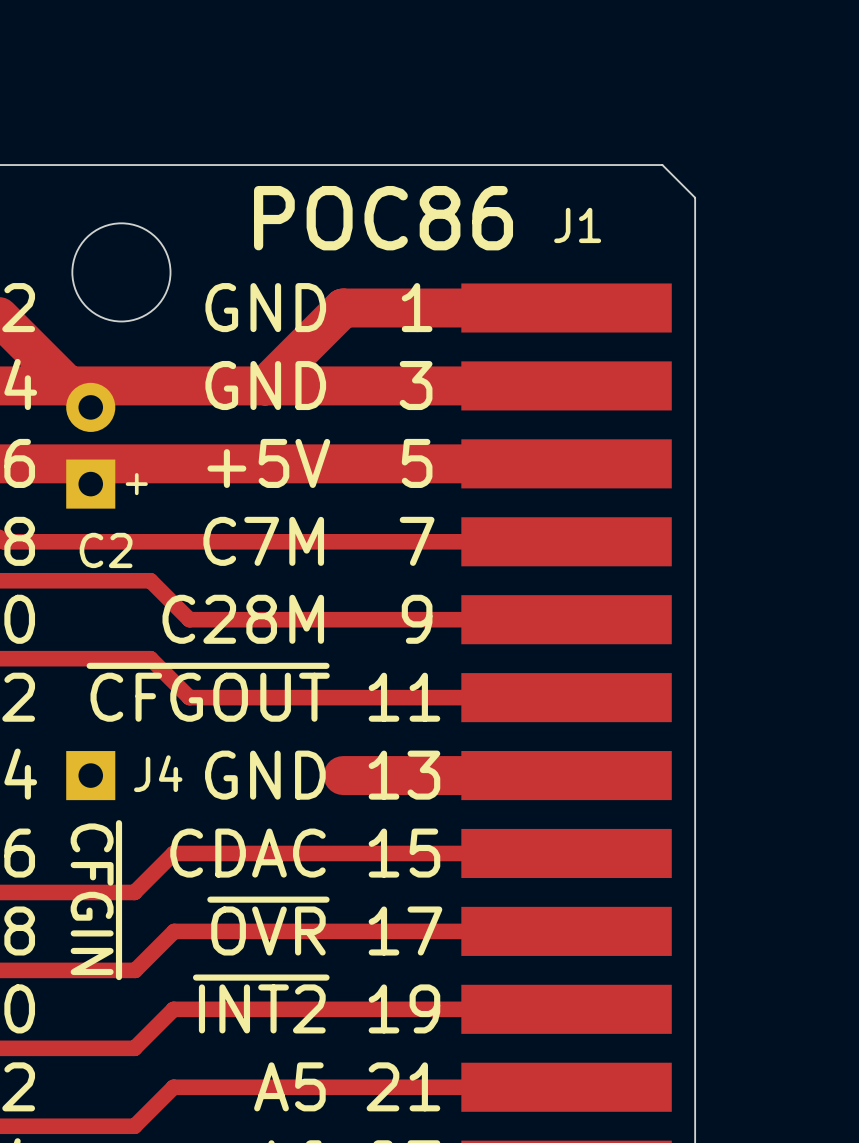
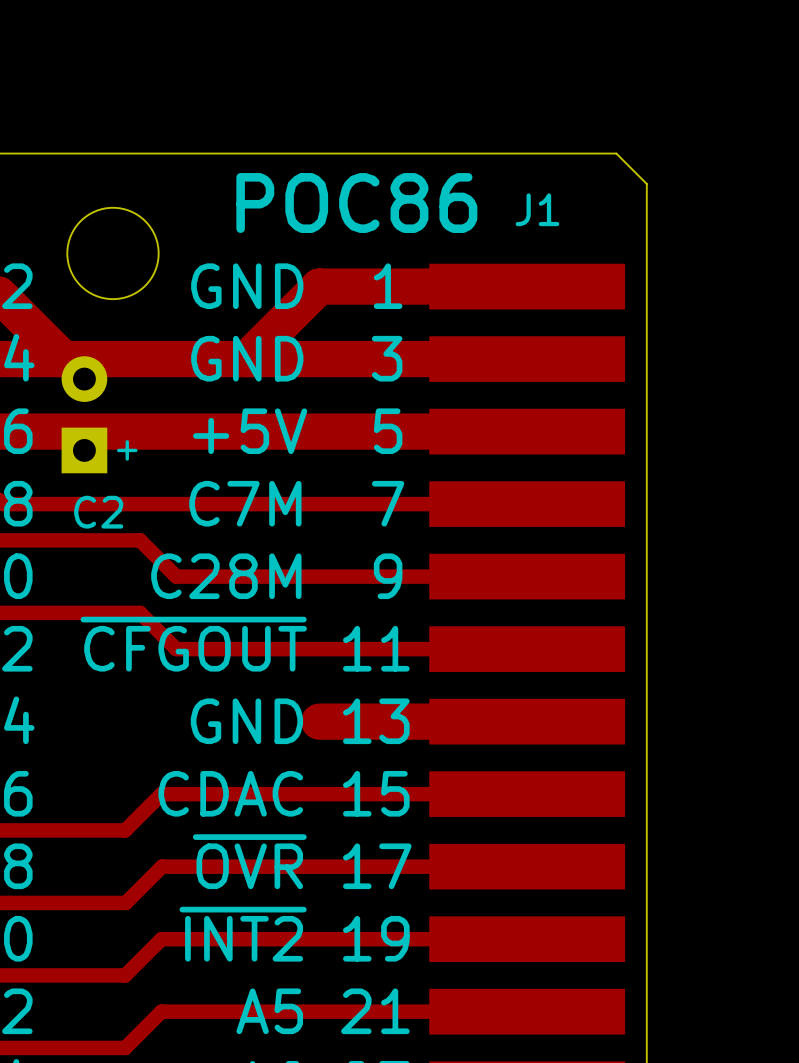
J4: (90, 775) -> none
text: ~{CFGIN} (96, 900) -> none

